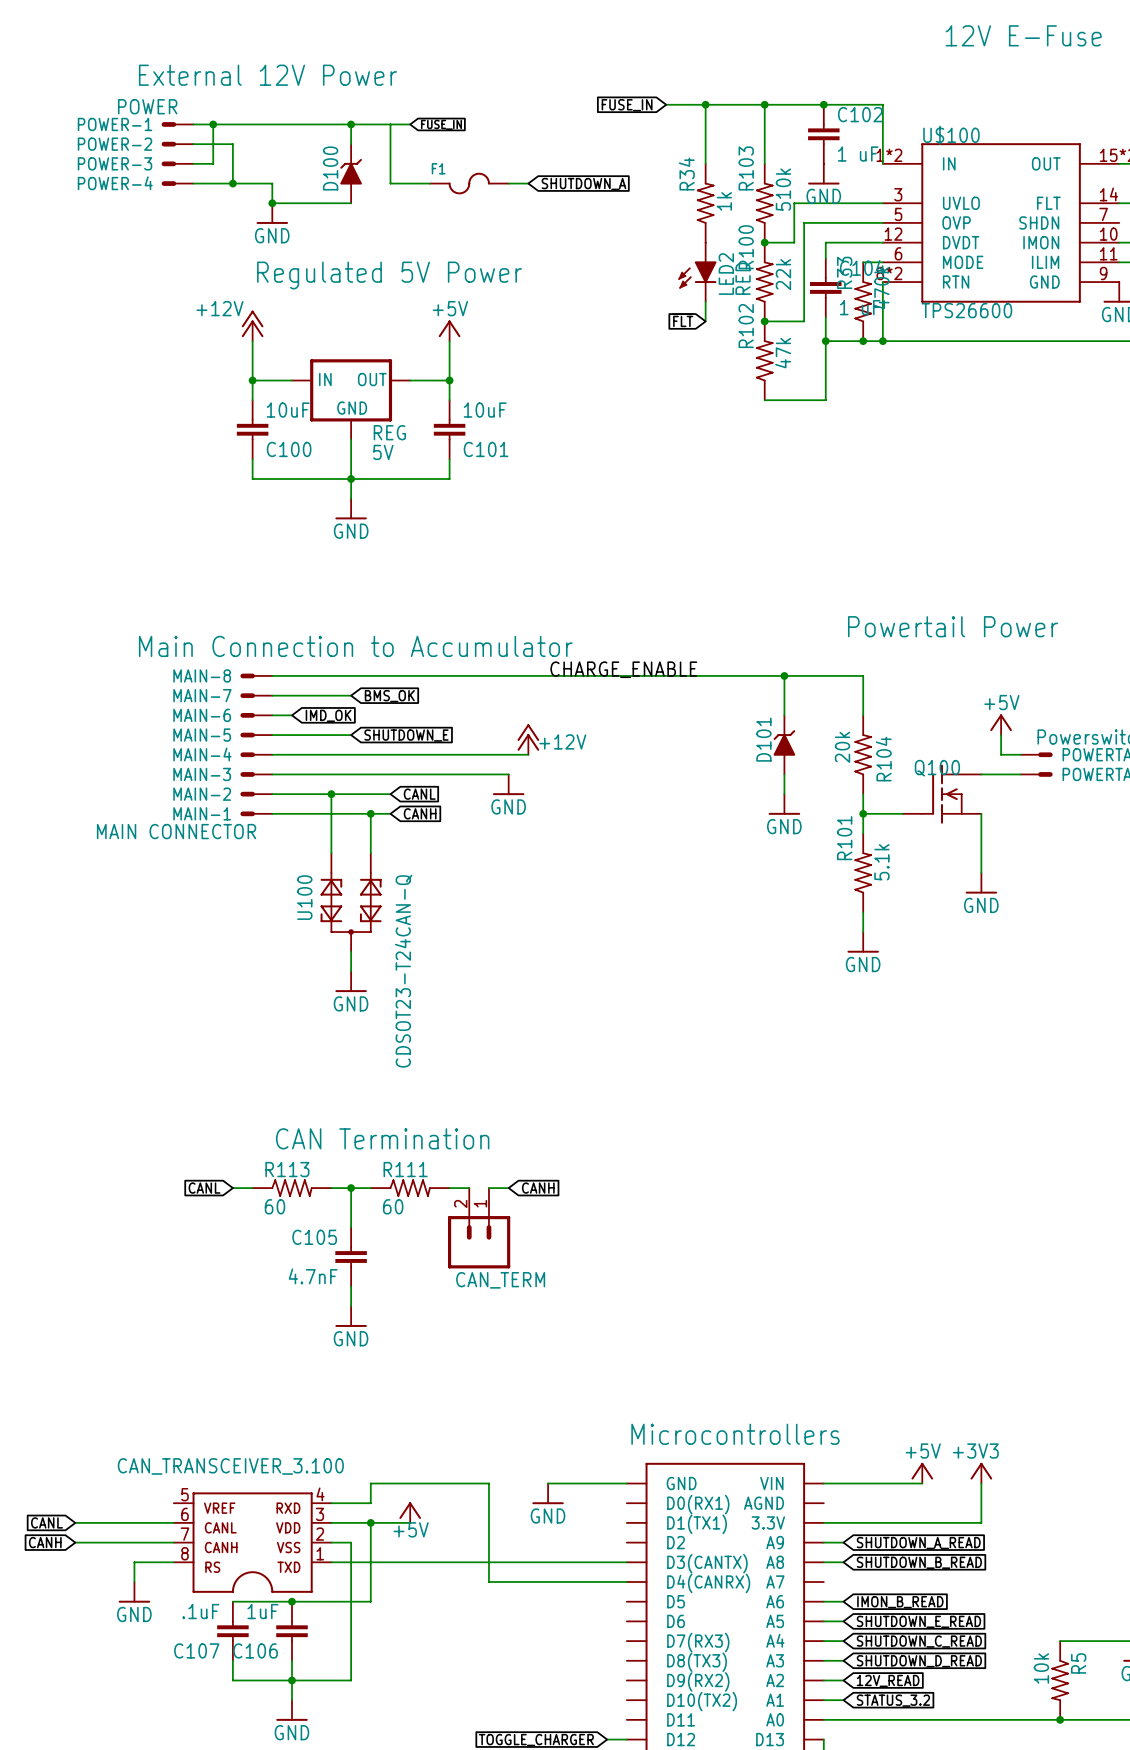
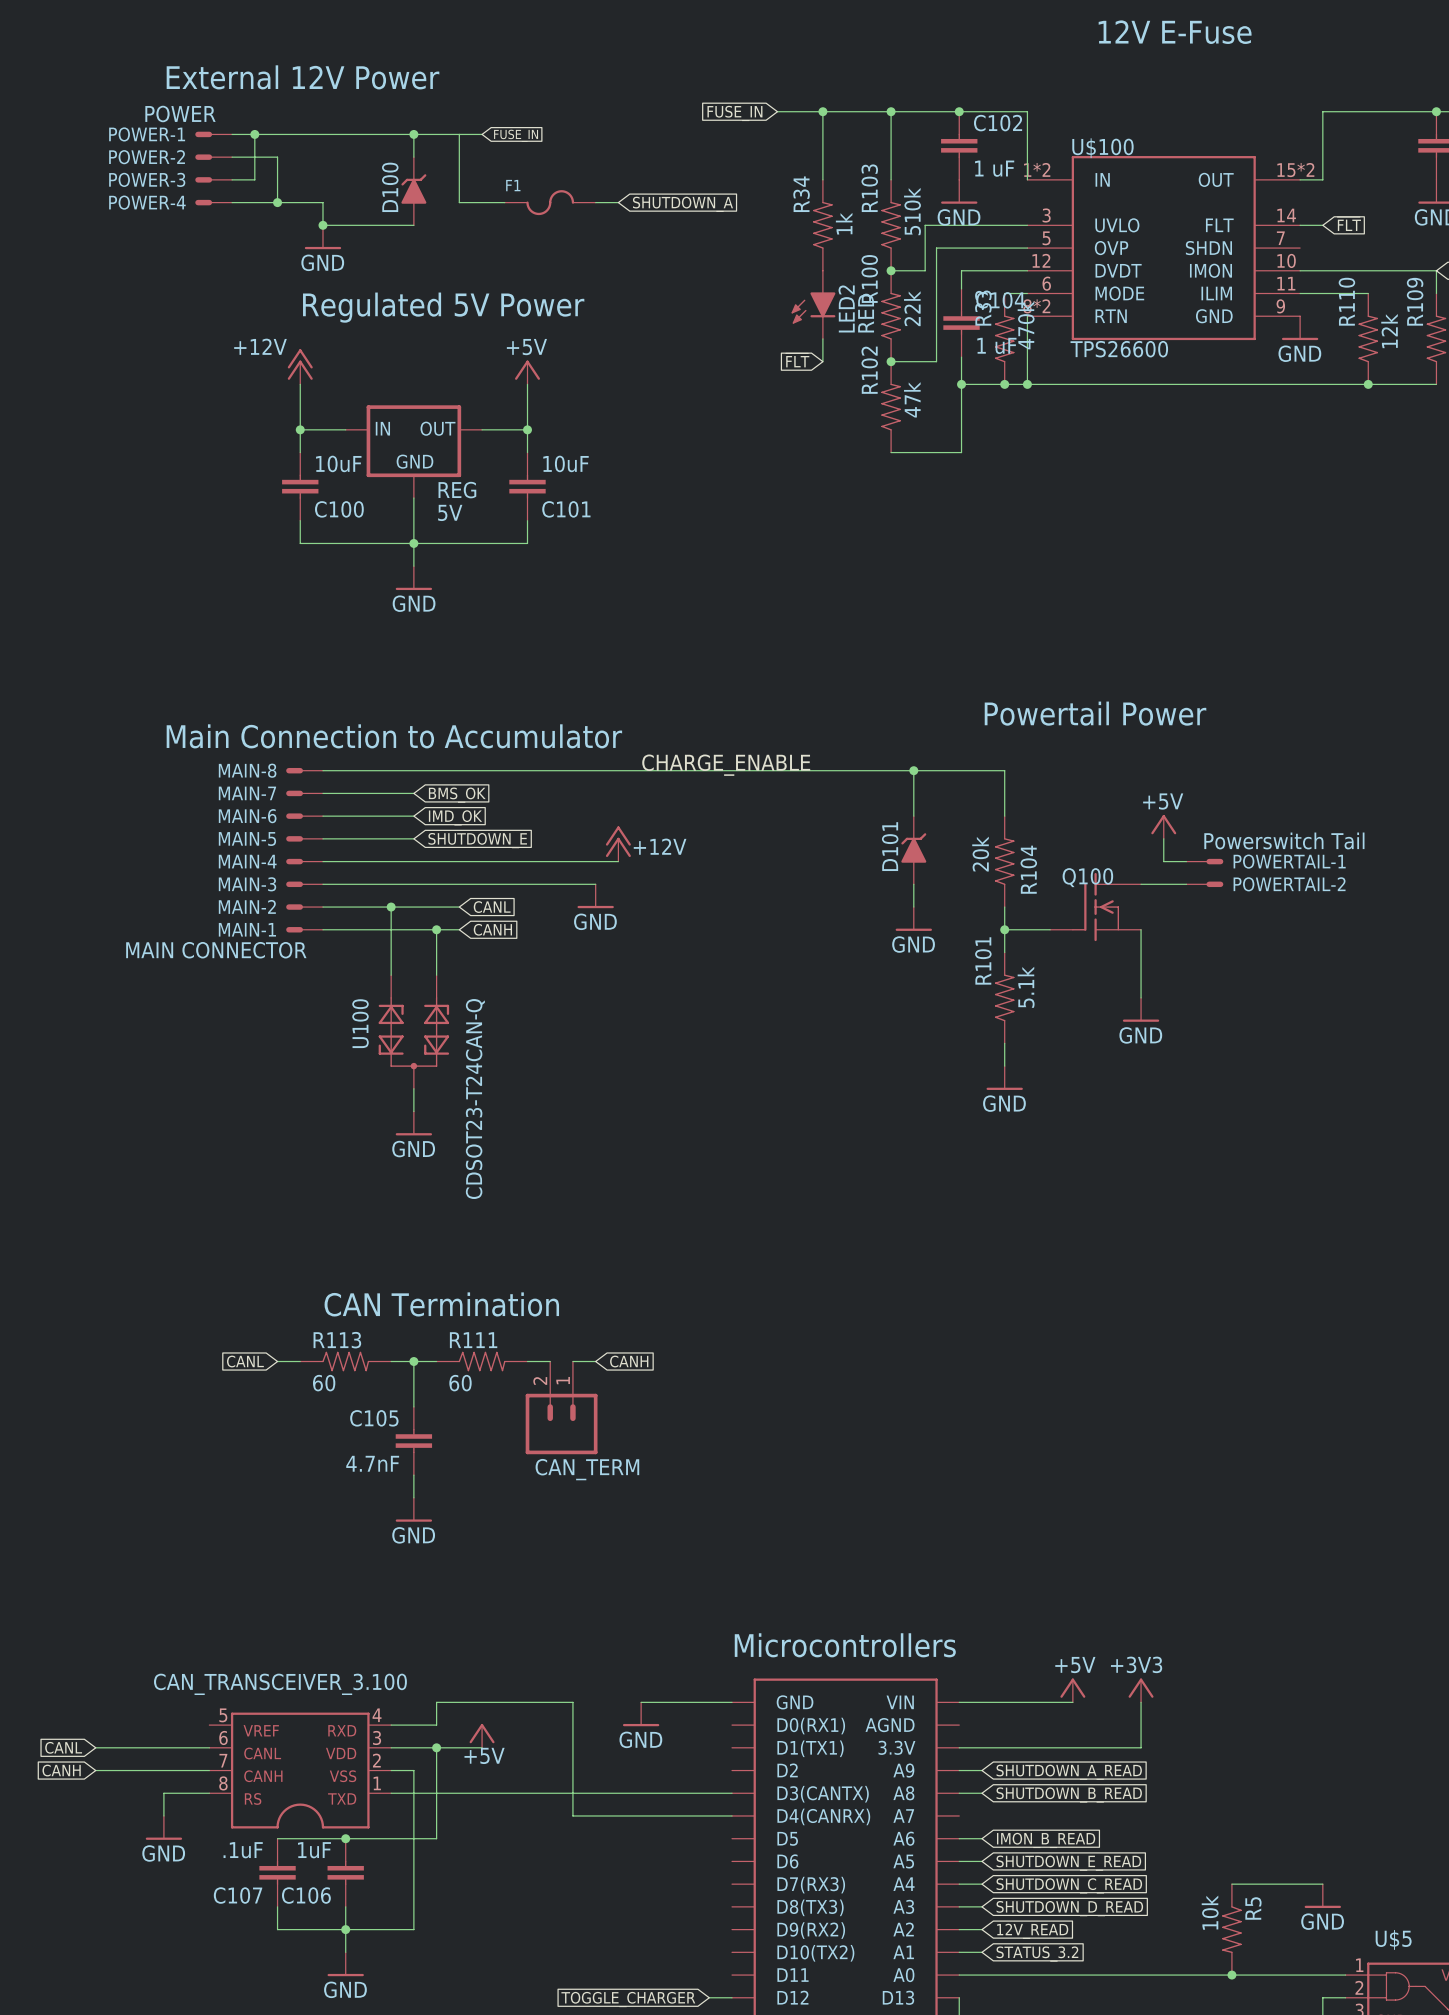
wire: none -> (345, 816) (413, 816)
global label position: IMD_OK (328, 715) -> IMD_OK (455, 817)

